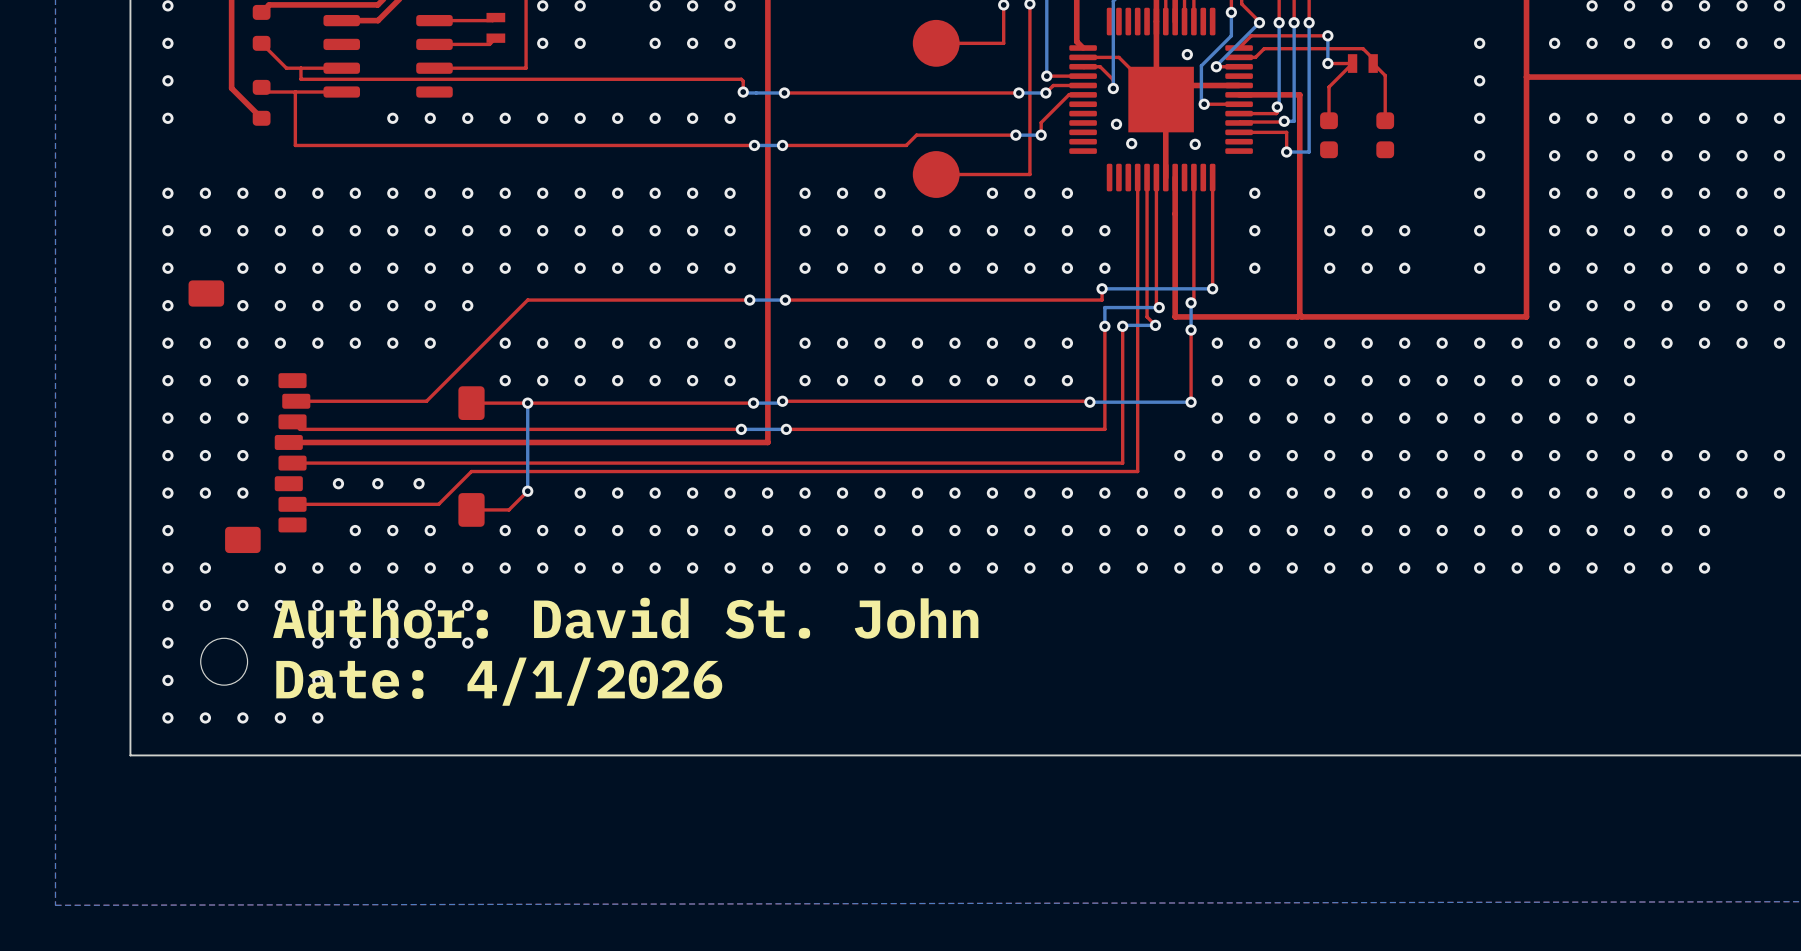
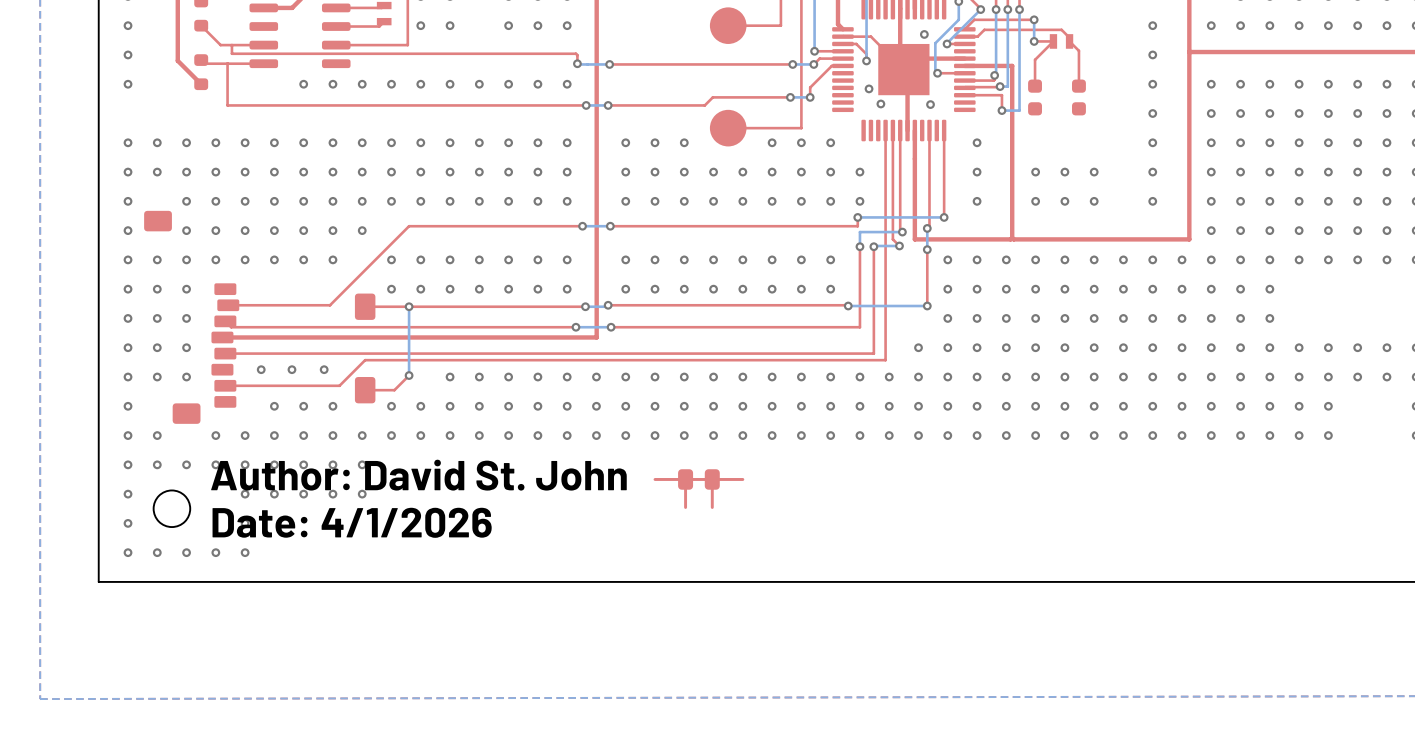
top track: none -> (685, 479) (685, 507)
part: none -> (698, 479)
top track: none -> (712, 479) (712, 507)
top track: none -> (742, 479) (655, 479)

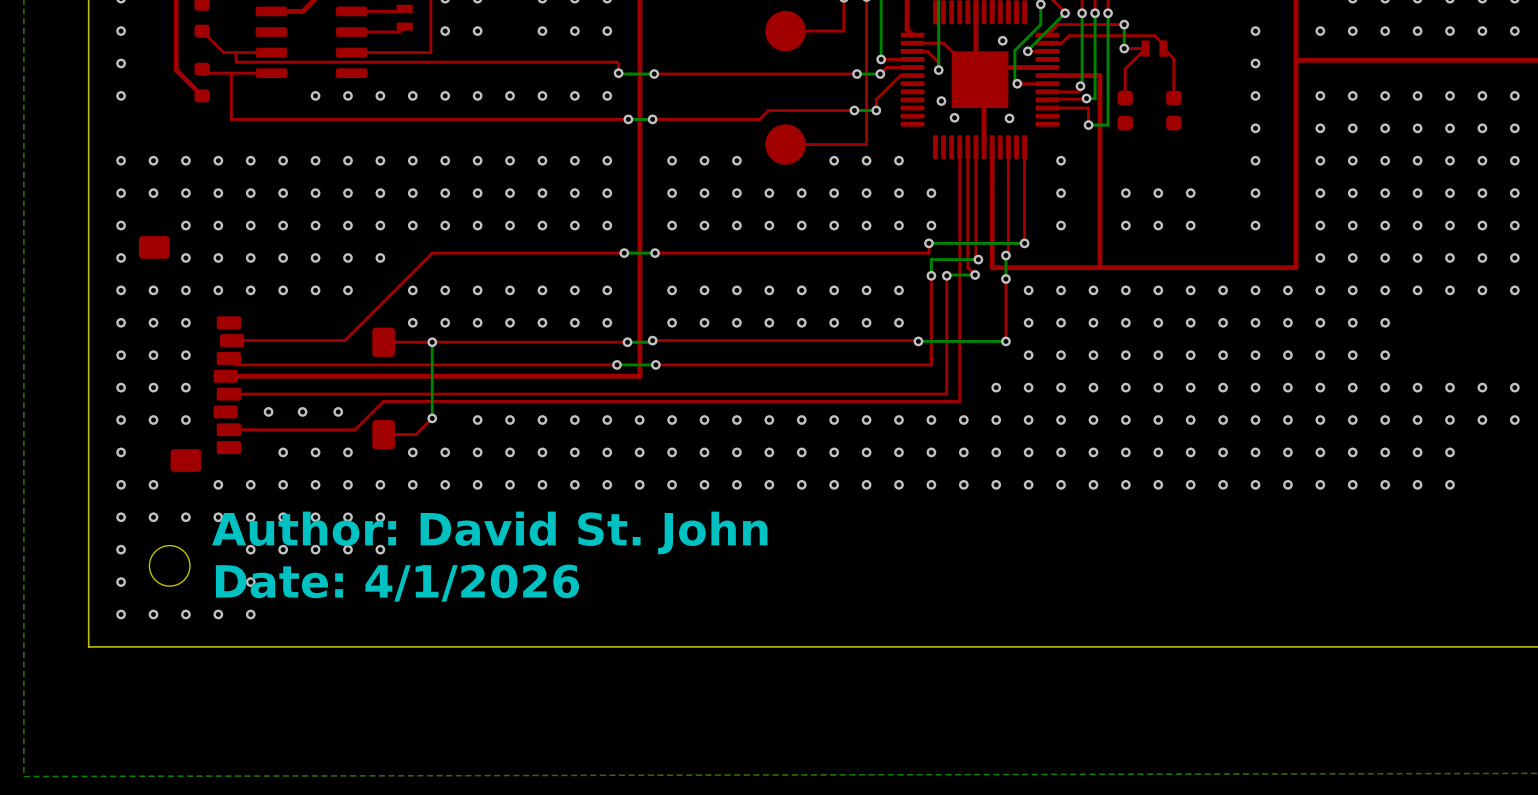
top track: (685, 479) (685, 507) -> none
part: (698, 479) -> none
top track: (712, 479) (712, 507) -> none
top track: (742, 479) (655, 479) -> none

